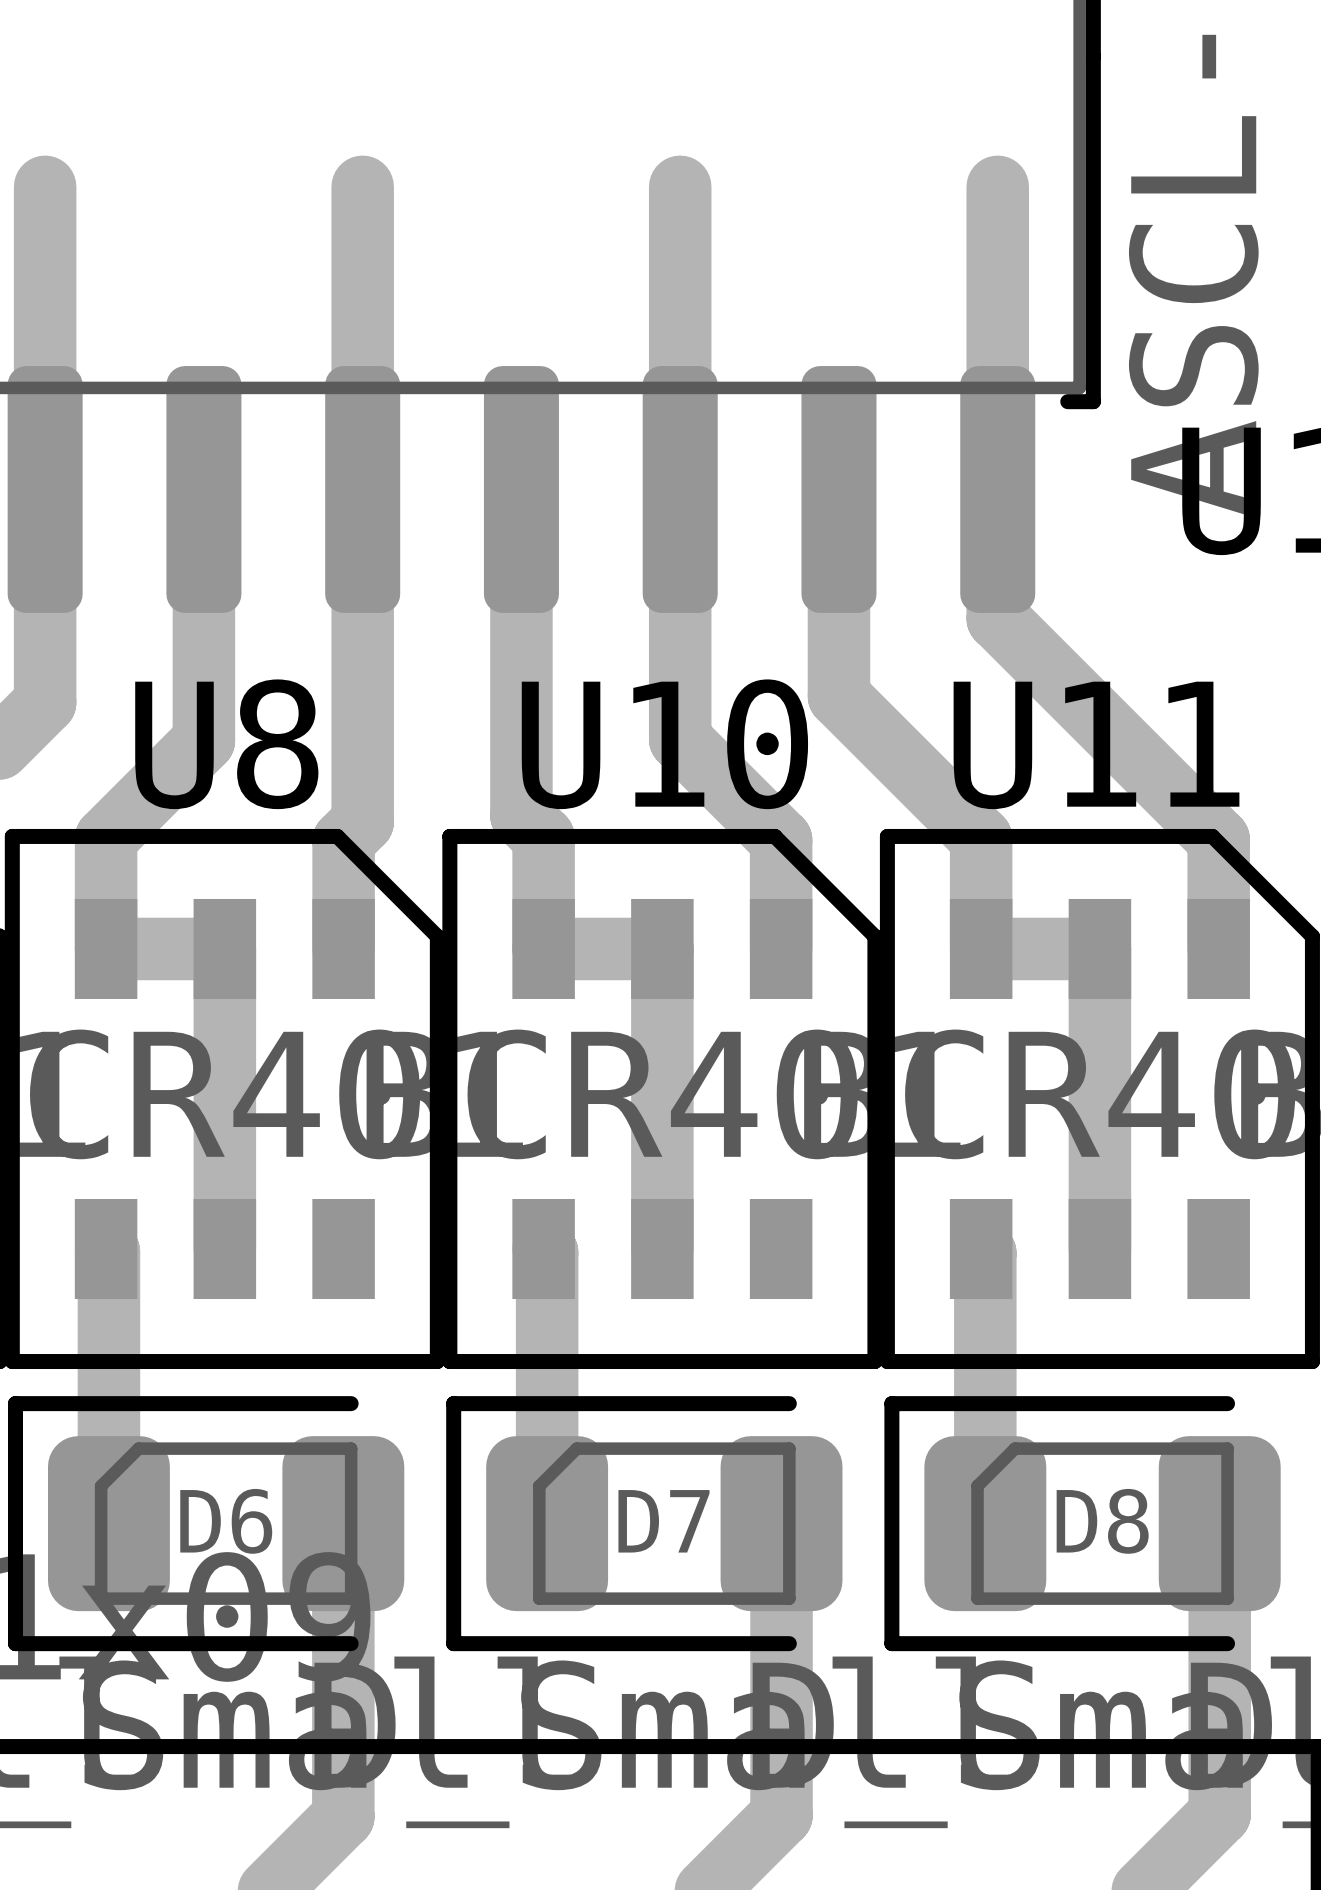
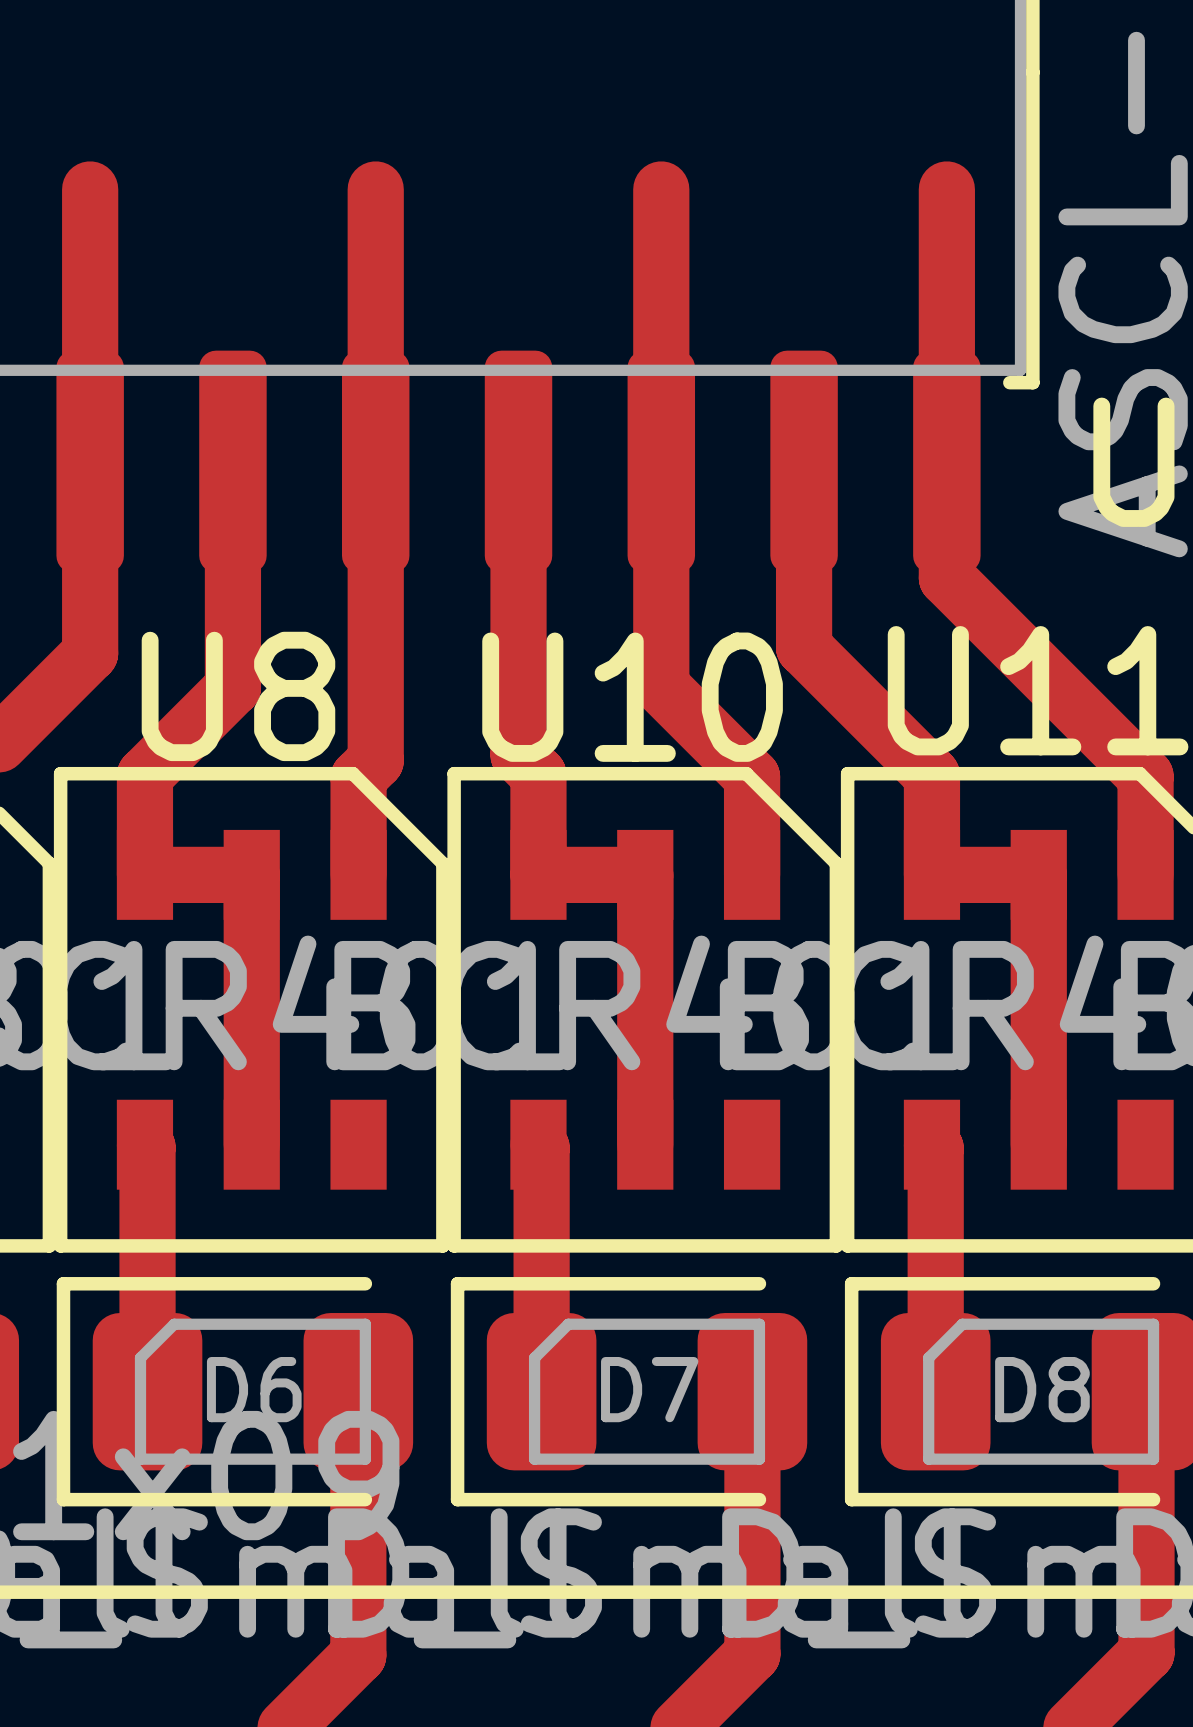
U8 name position: U8 (226, 744) -> U8 (238, 696)
U10 name position: U10 (664, 744) -> U10 (632, 697)

